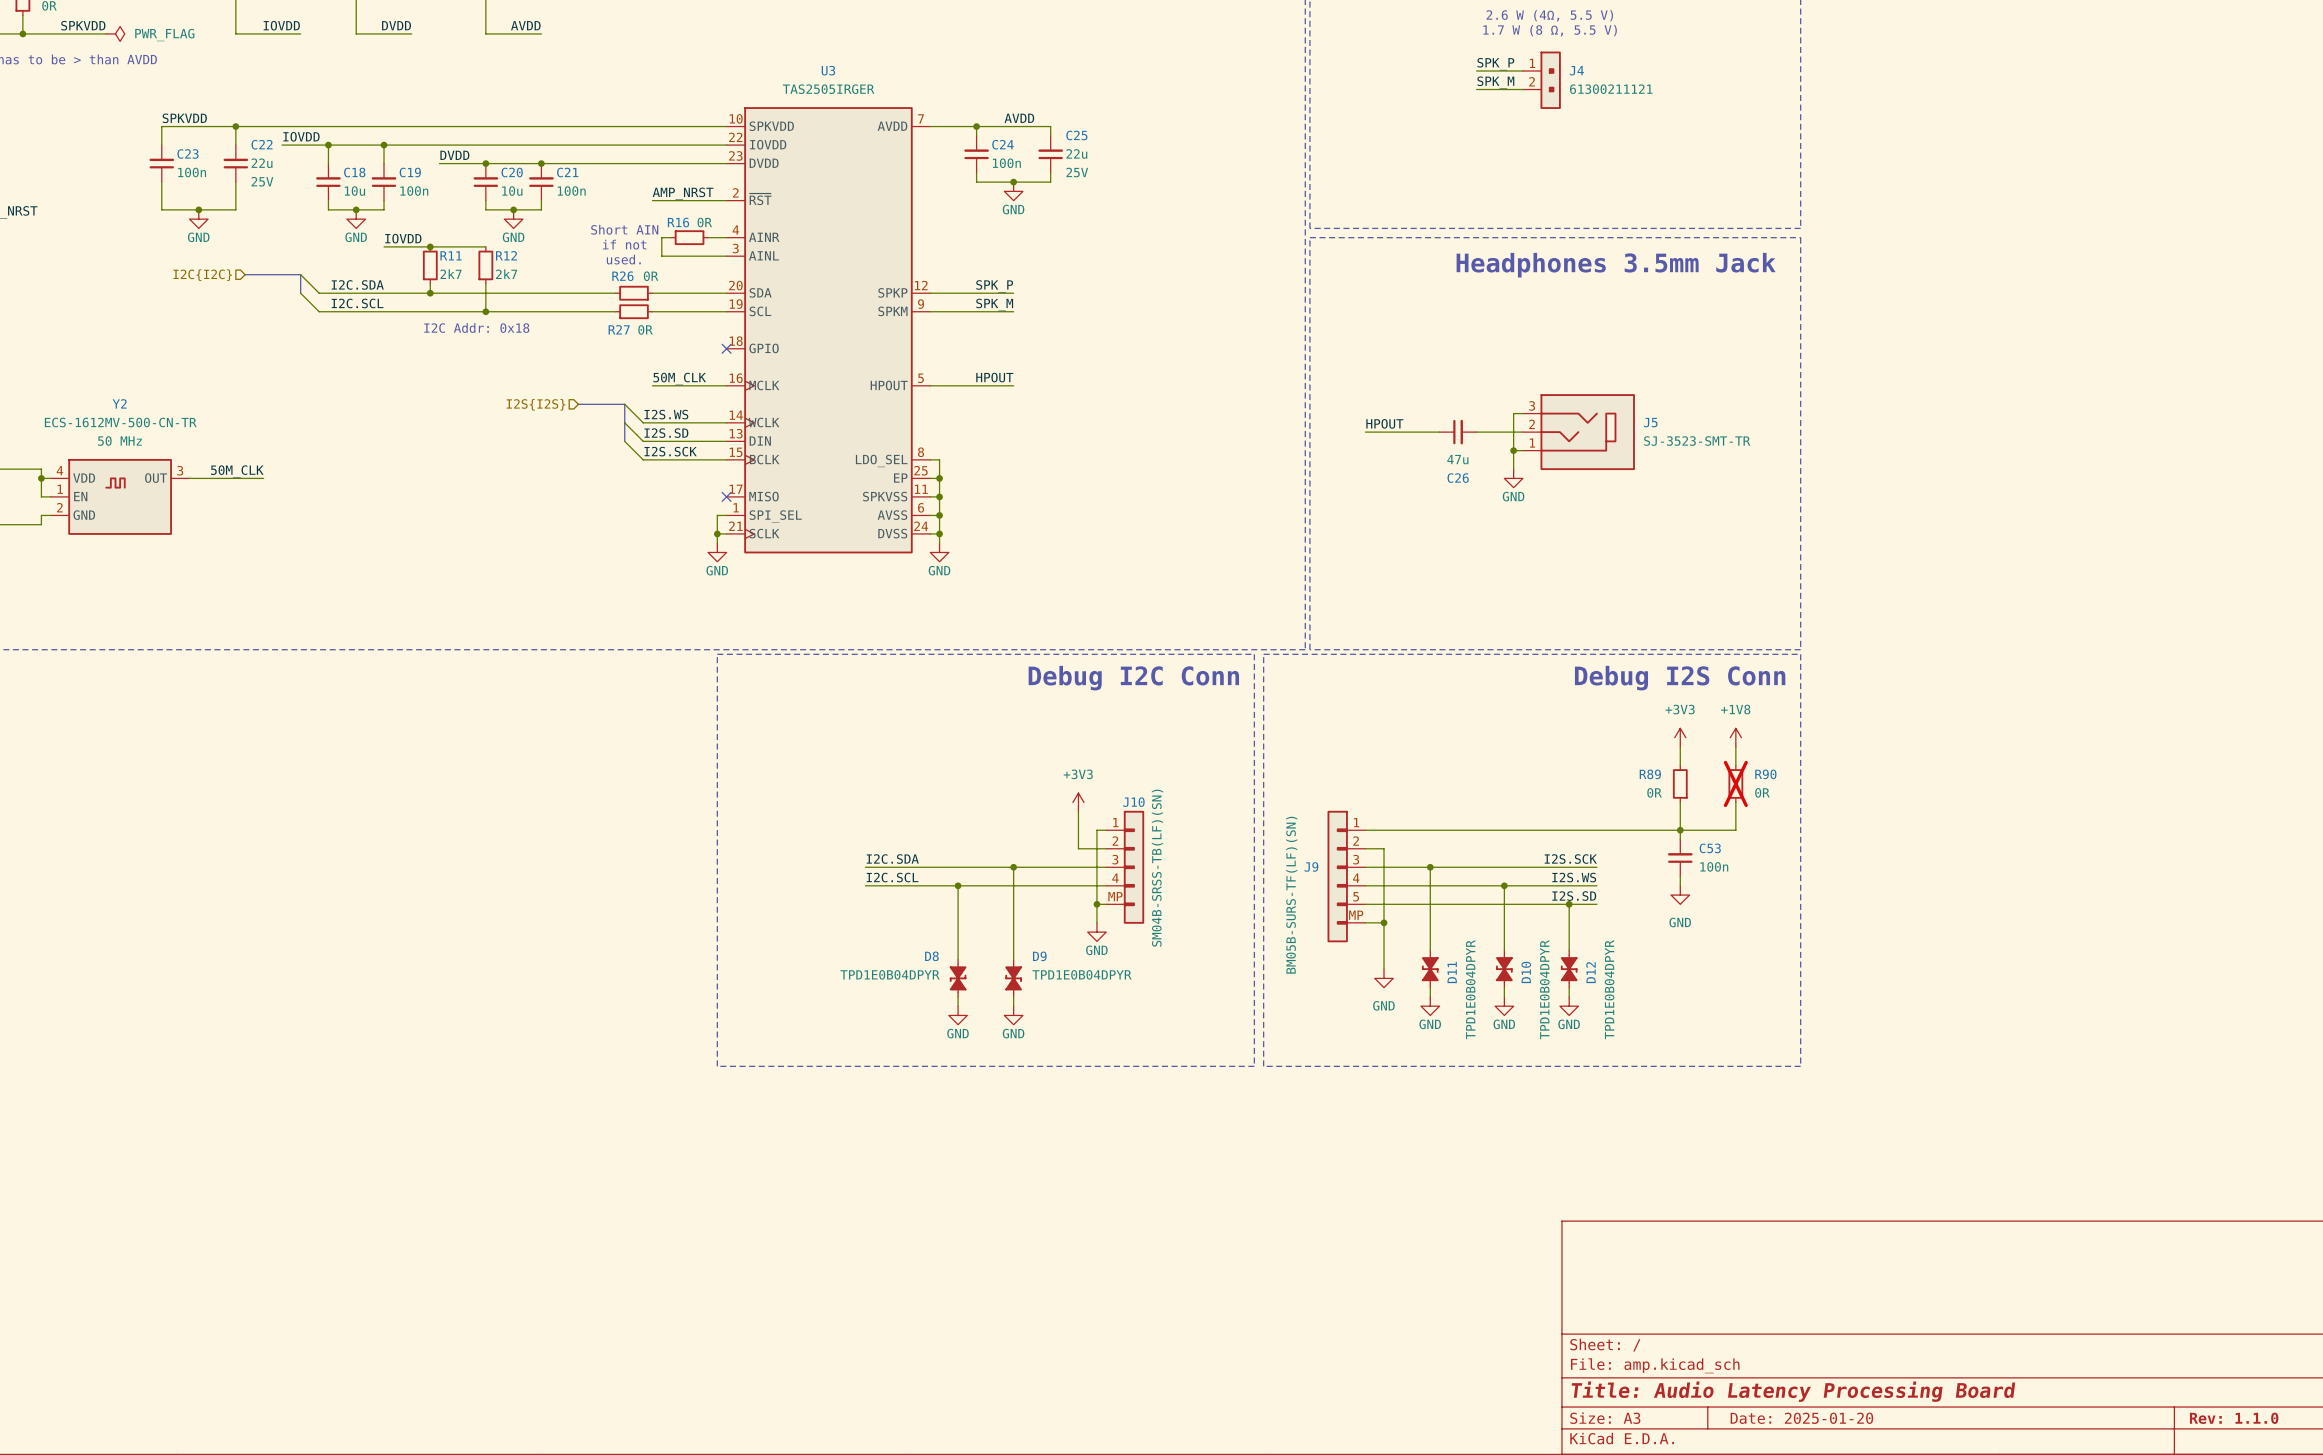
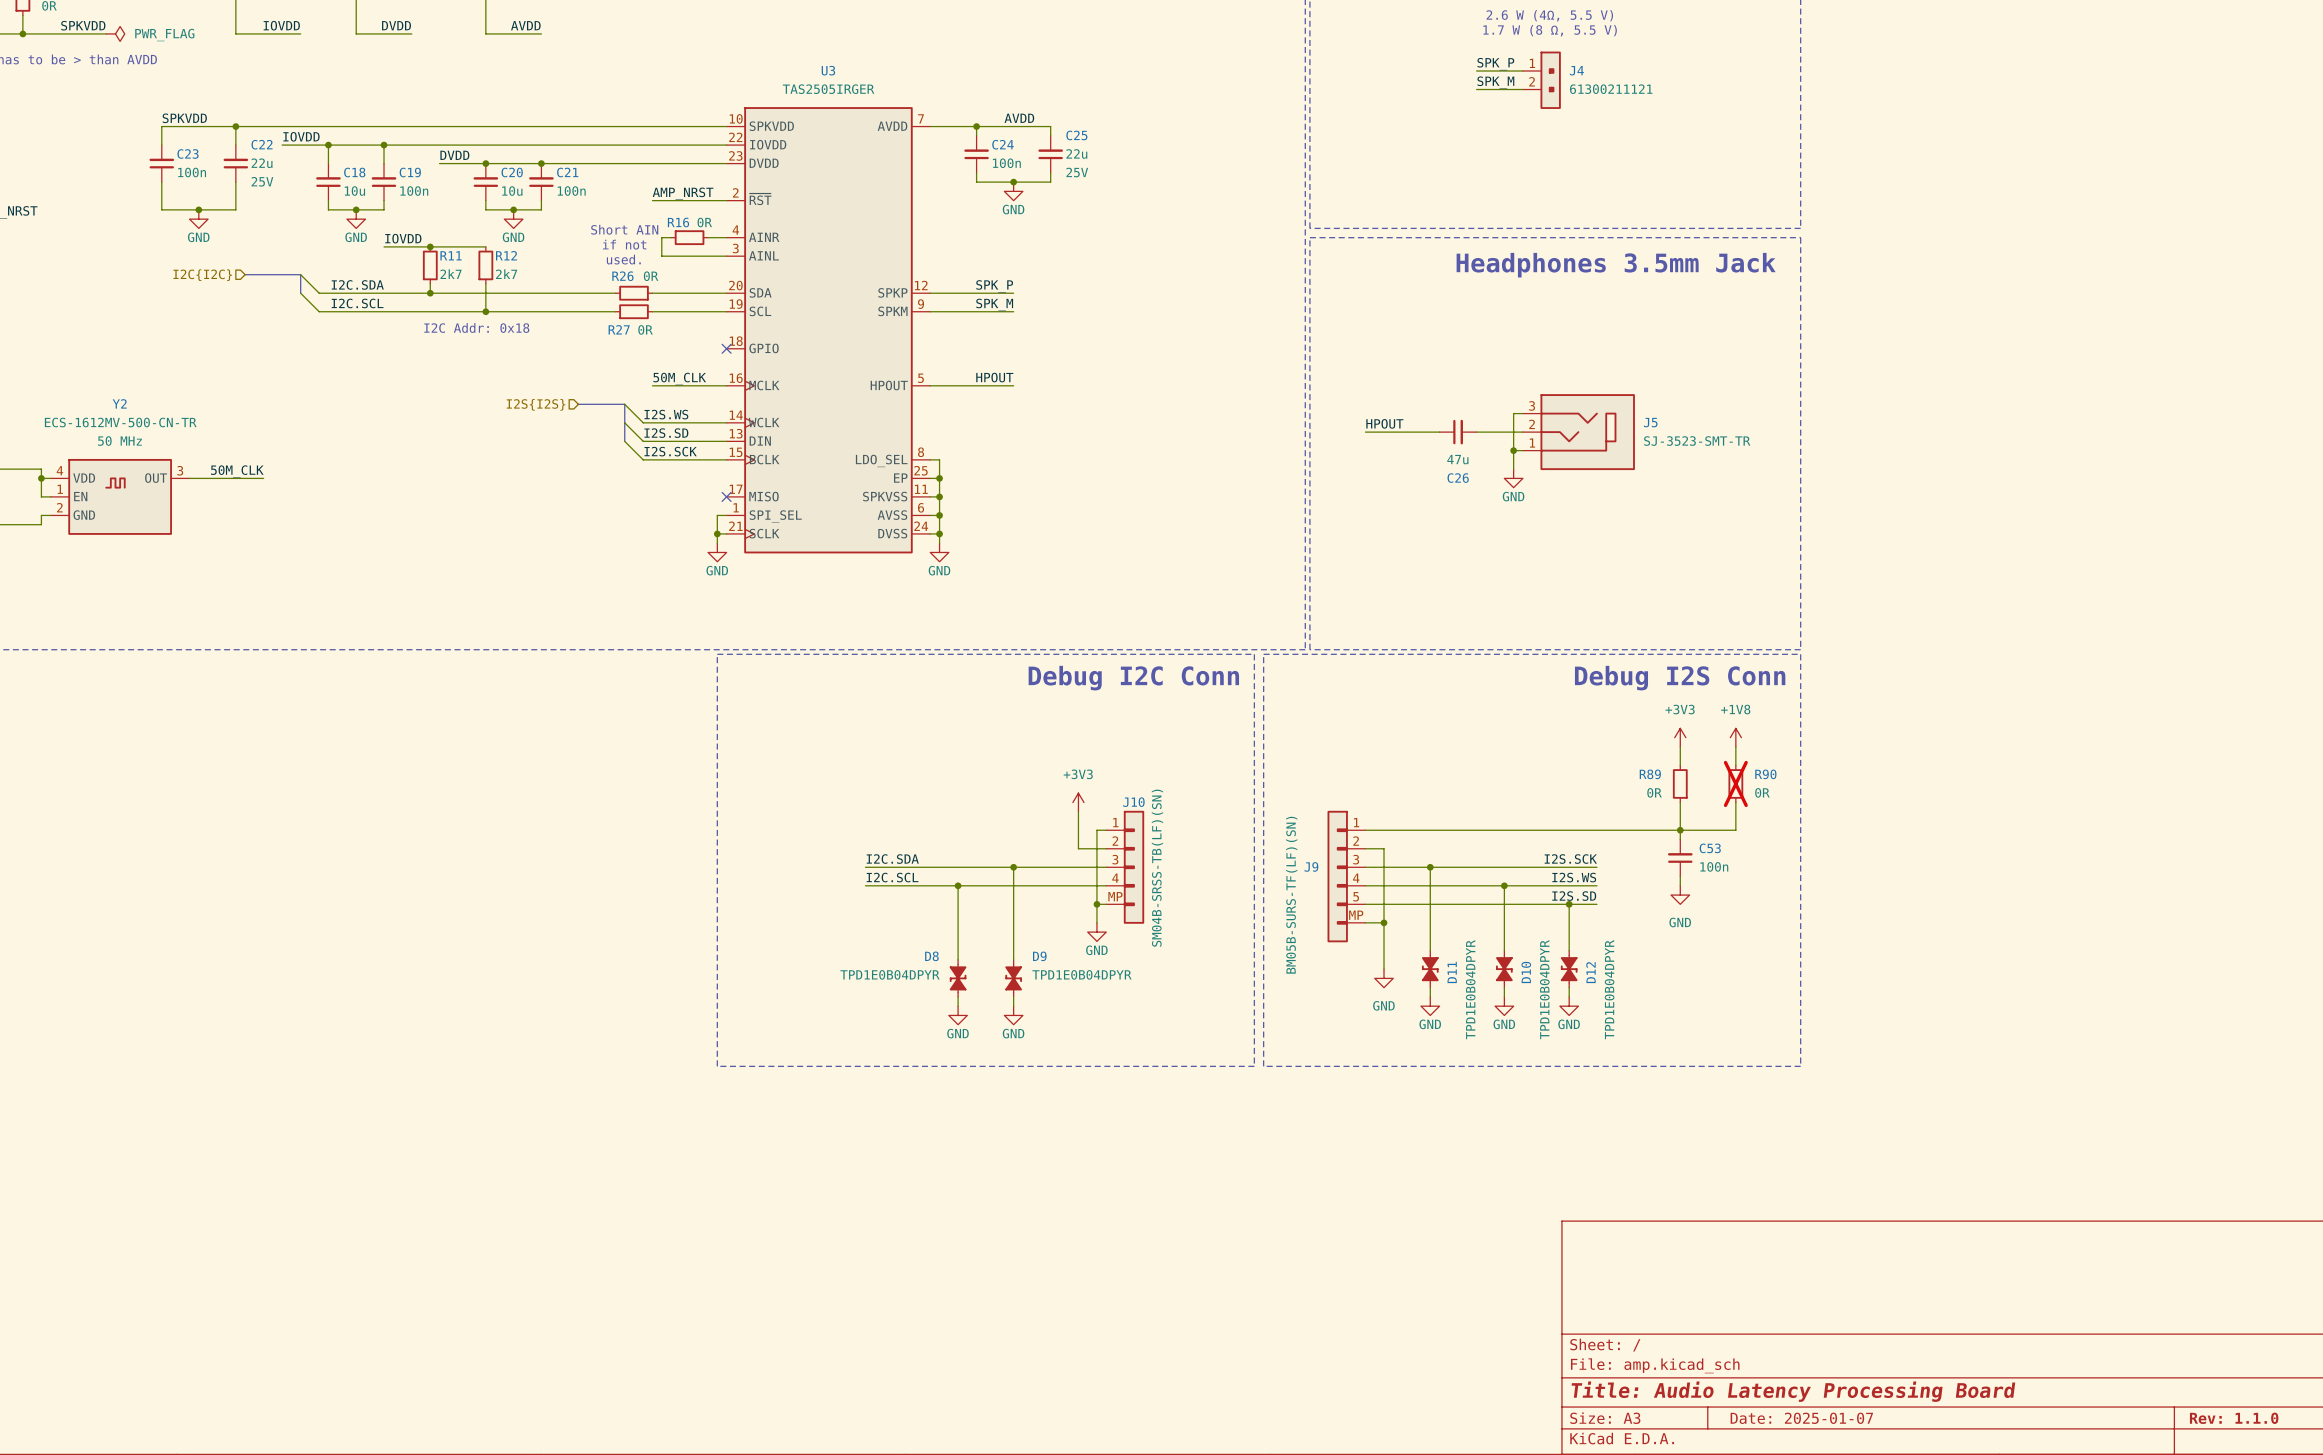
title block: Date: 2025-01-20 (1801, 1418) -> Date: 2025-01-07 (1801, 1418)

